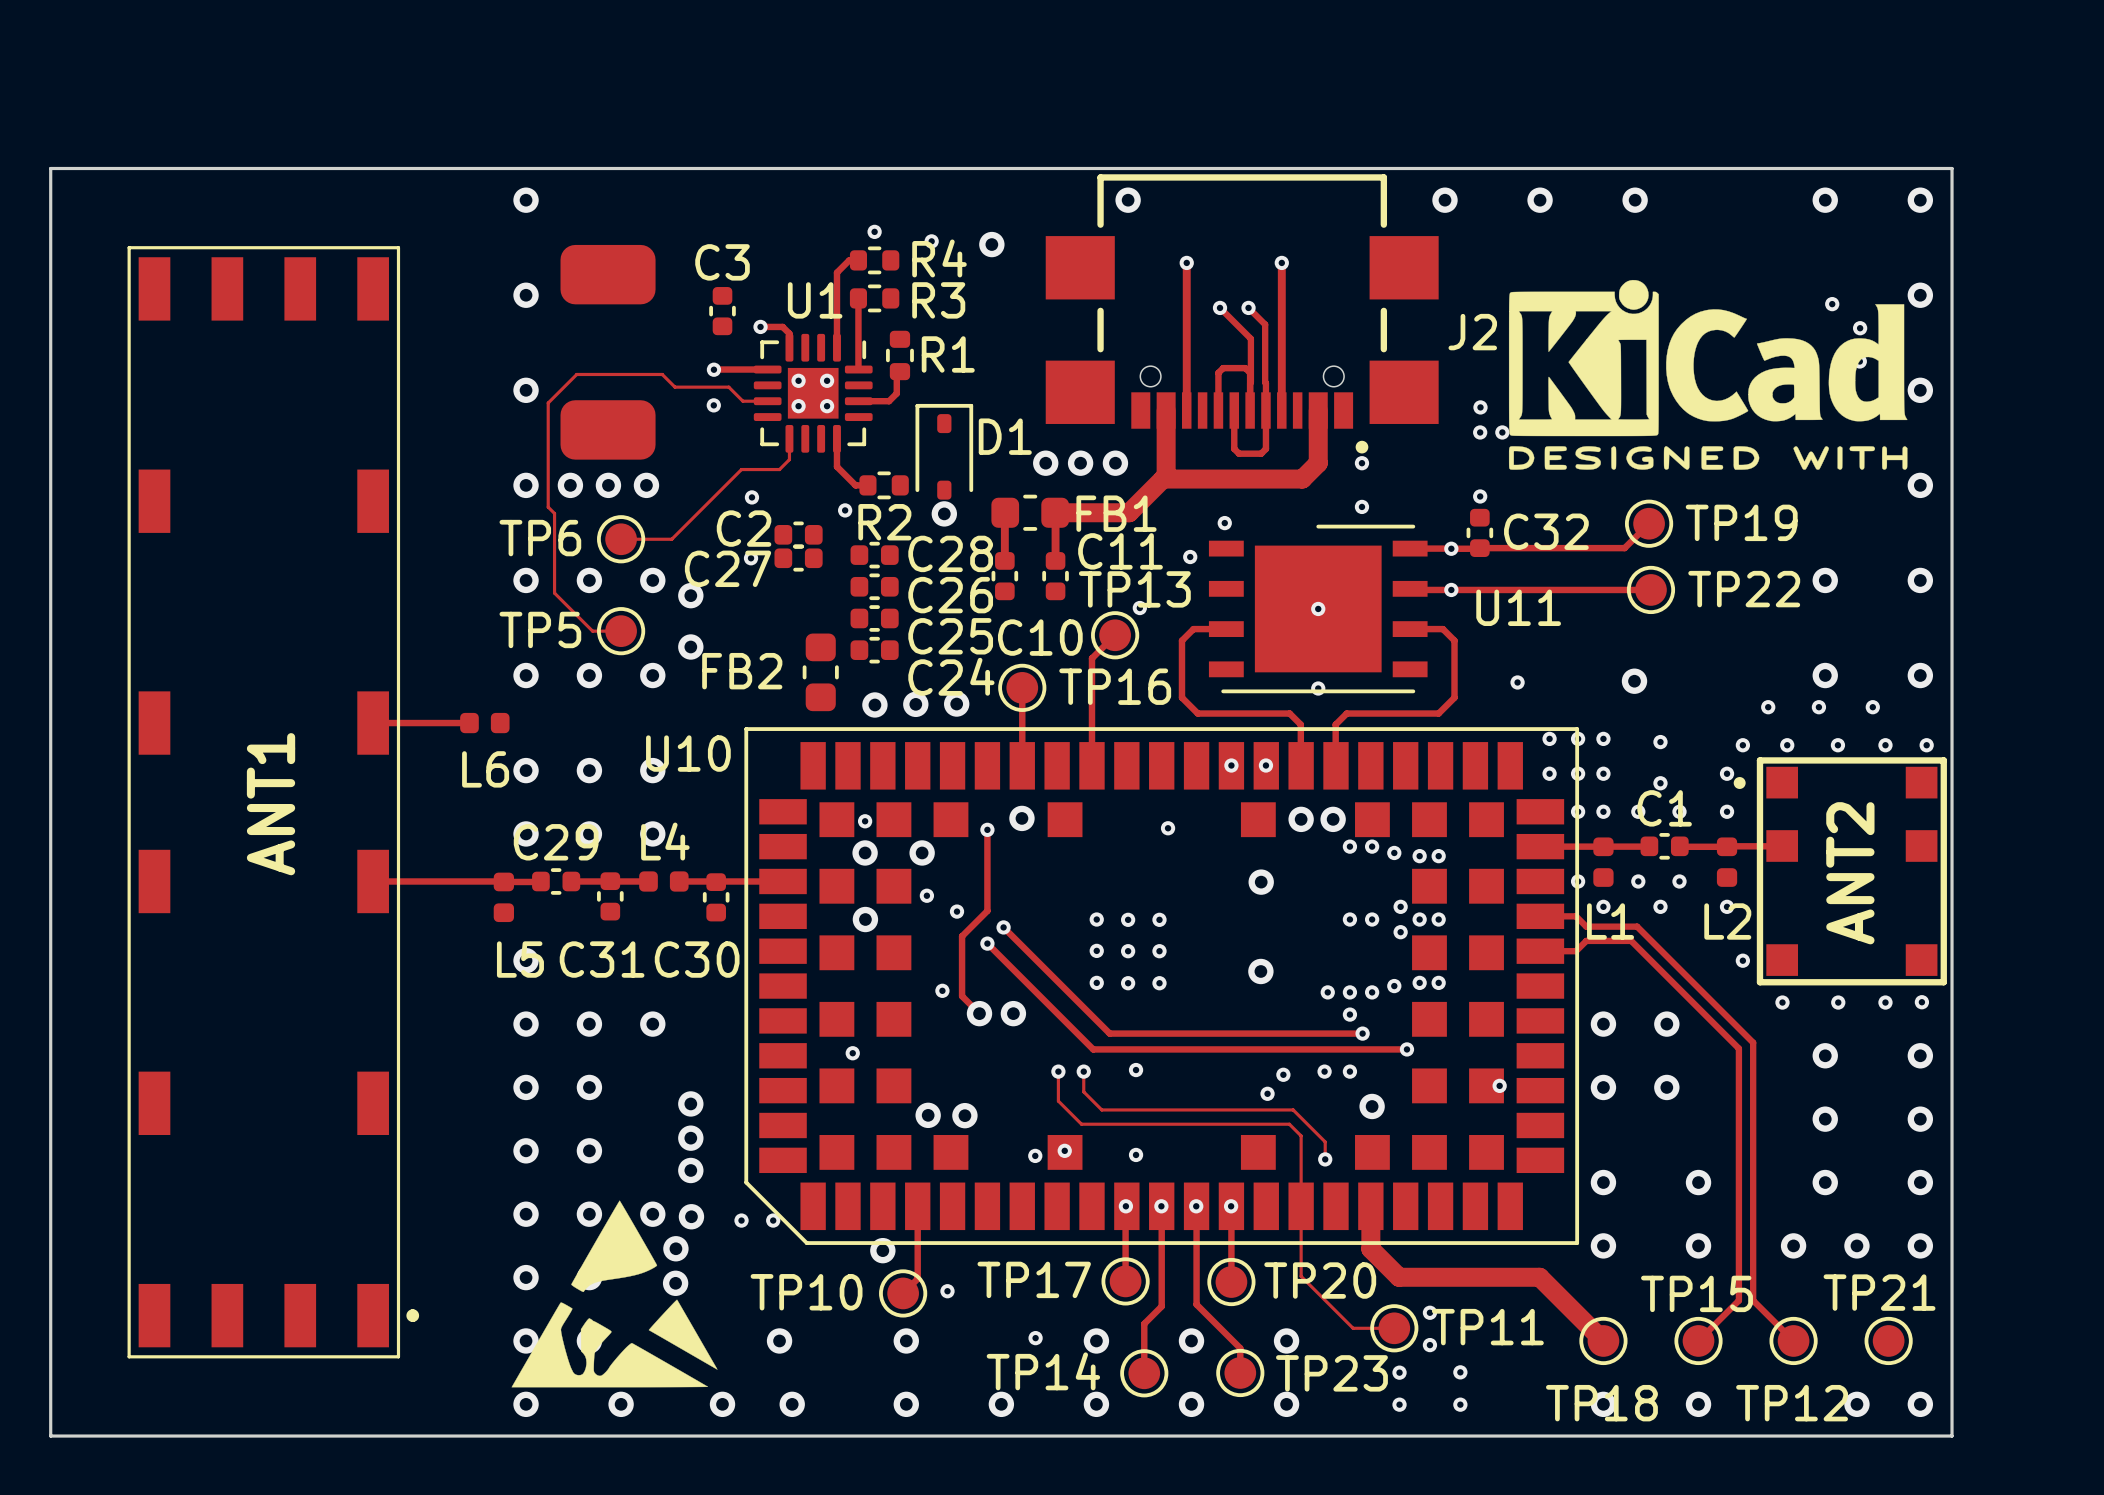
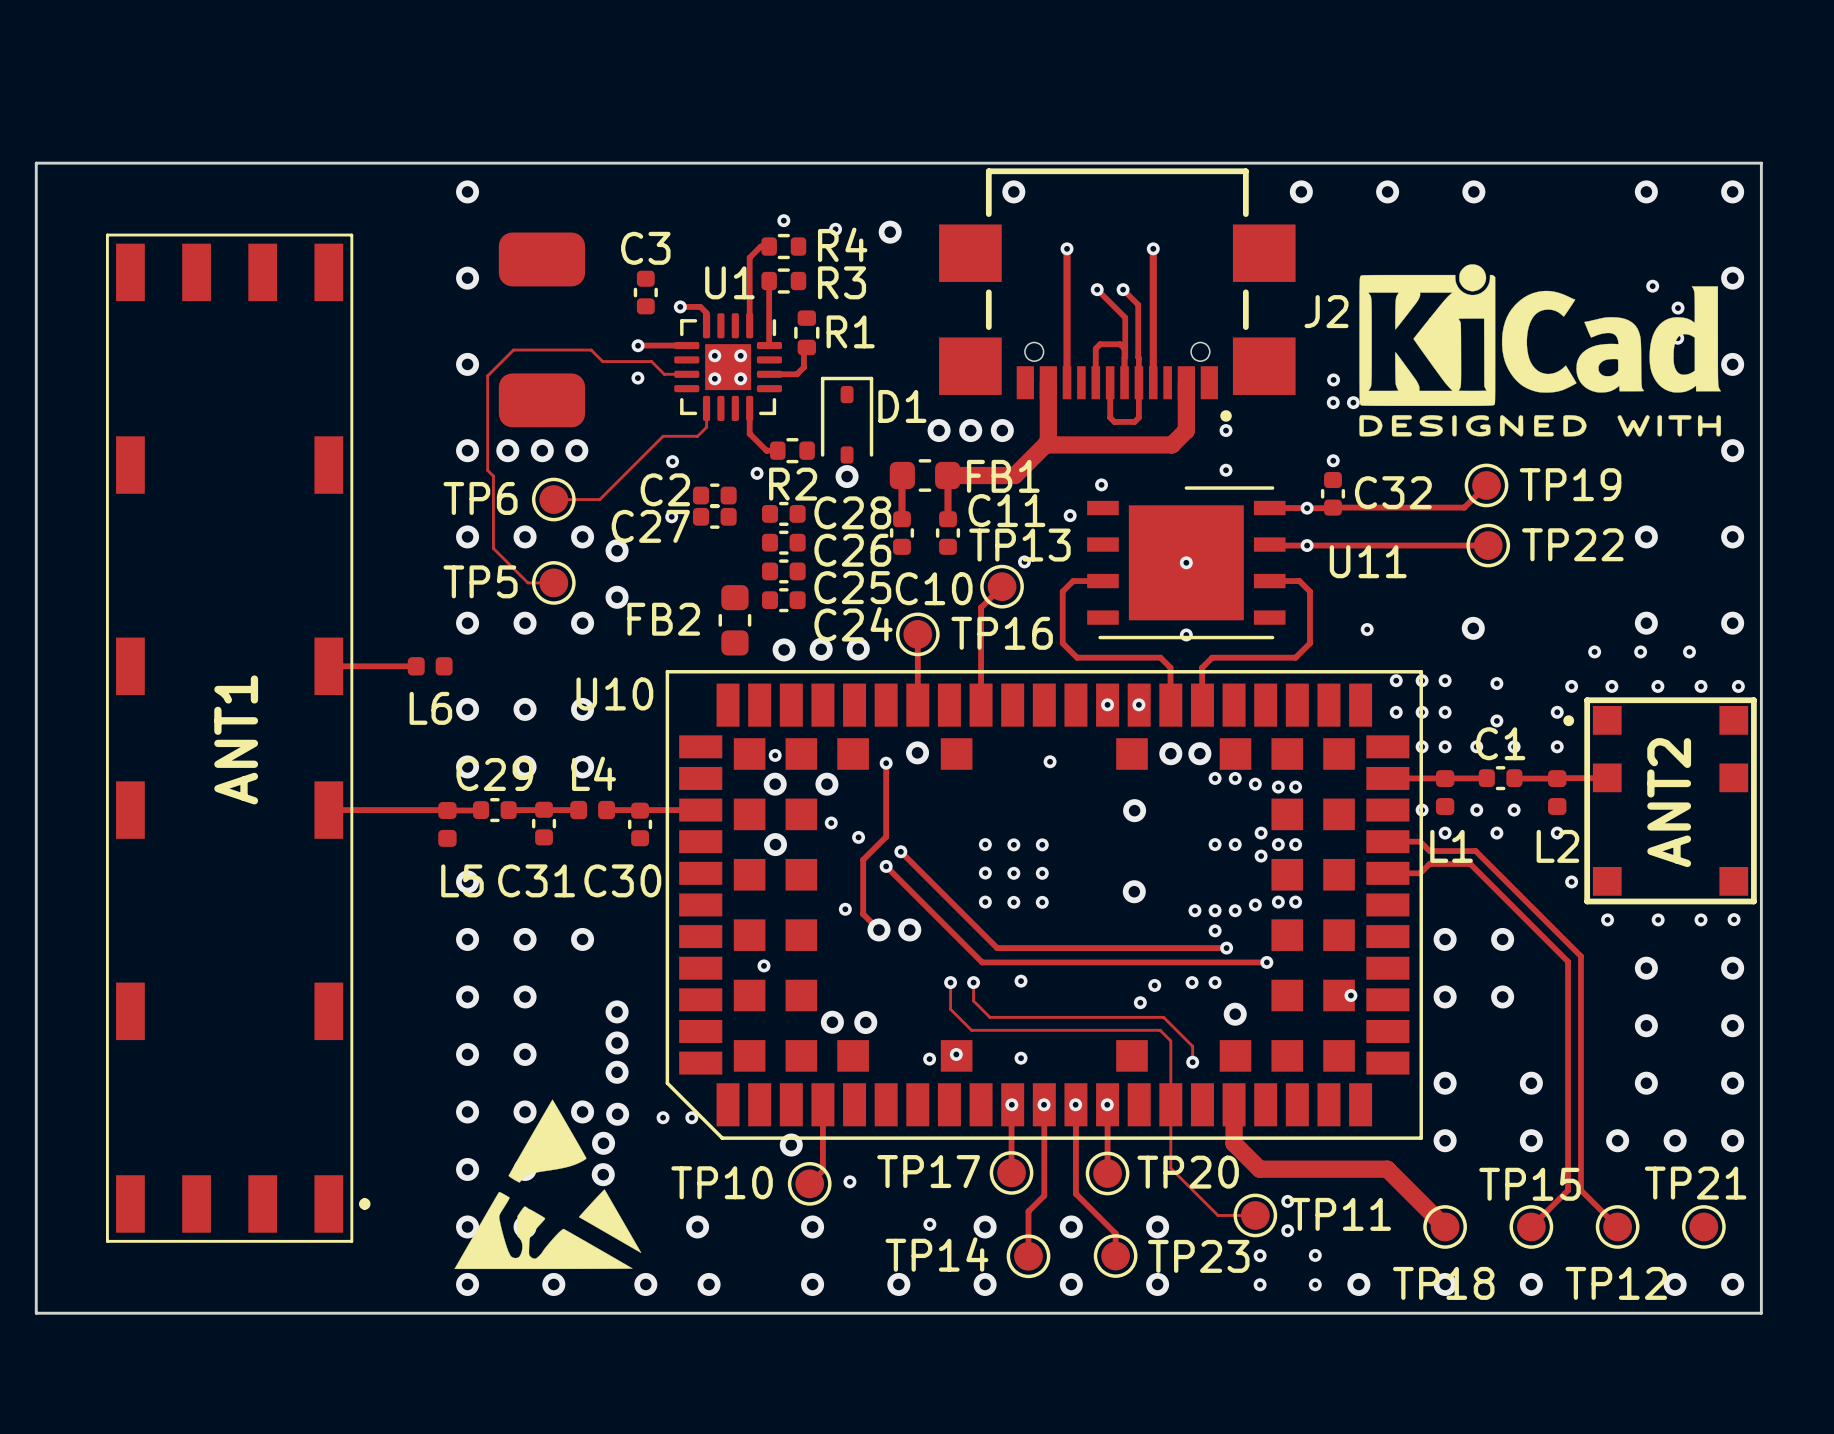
via: none -> (1358, 1284)

